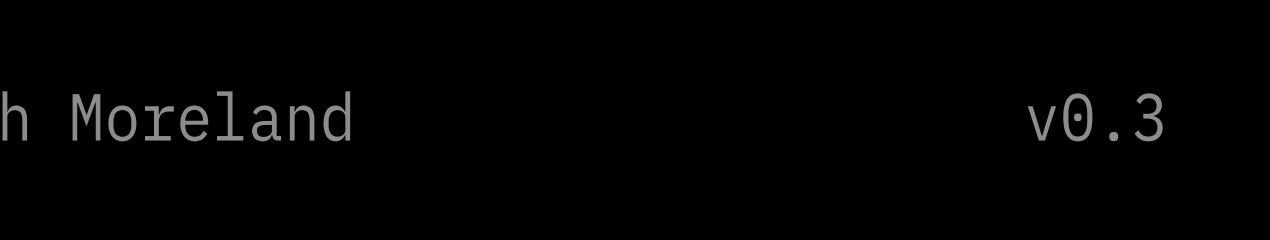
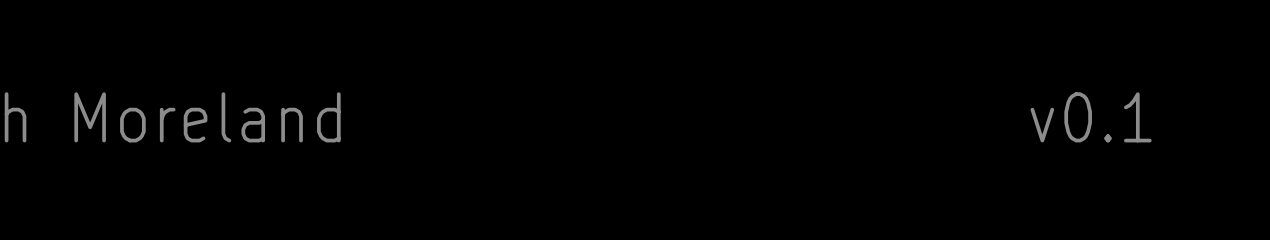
text: v0.3 (1095, 117) -> v0.1 (1091, 117)

